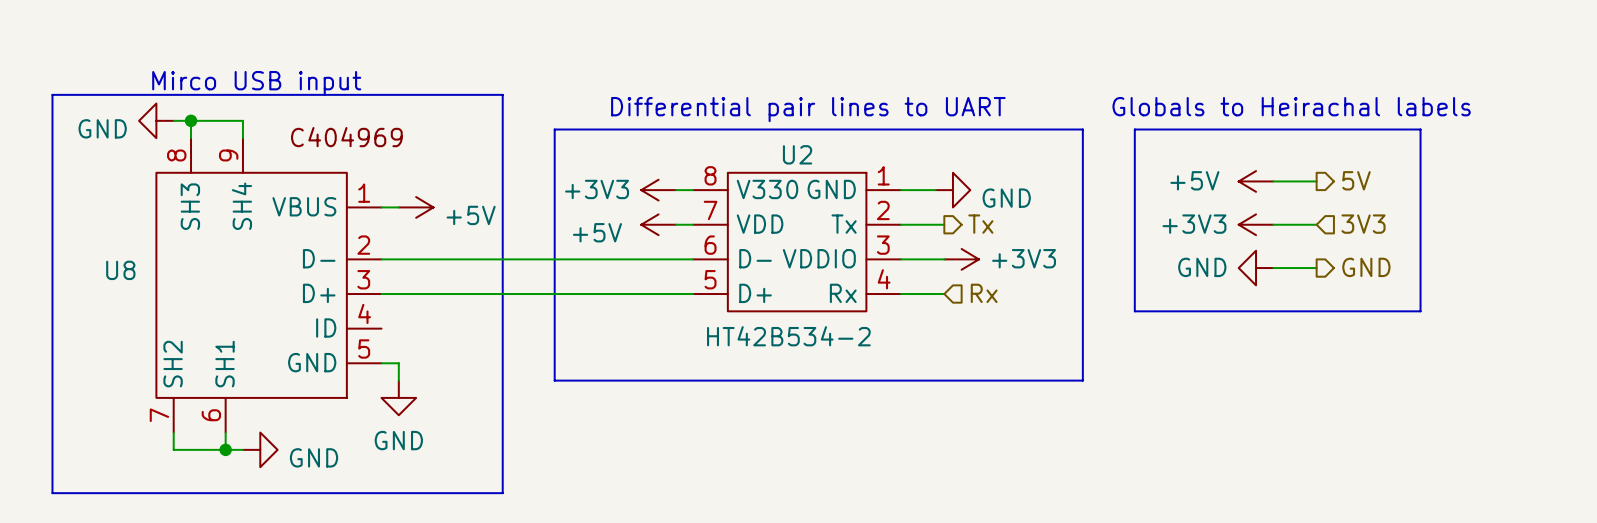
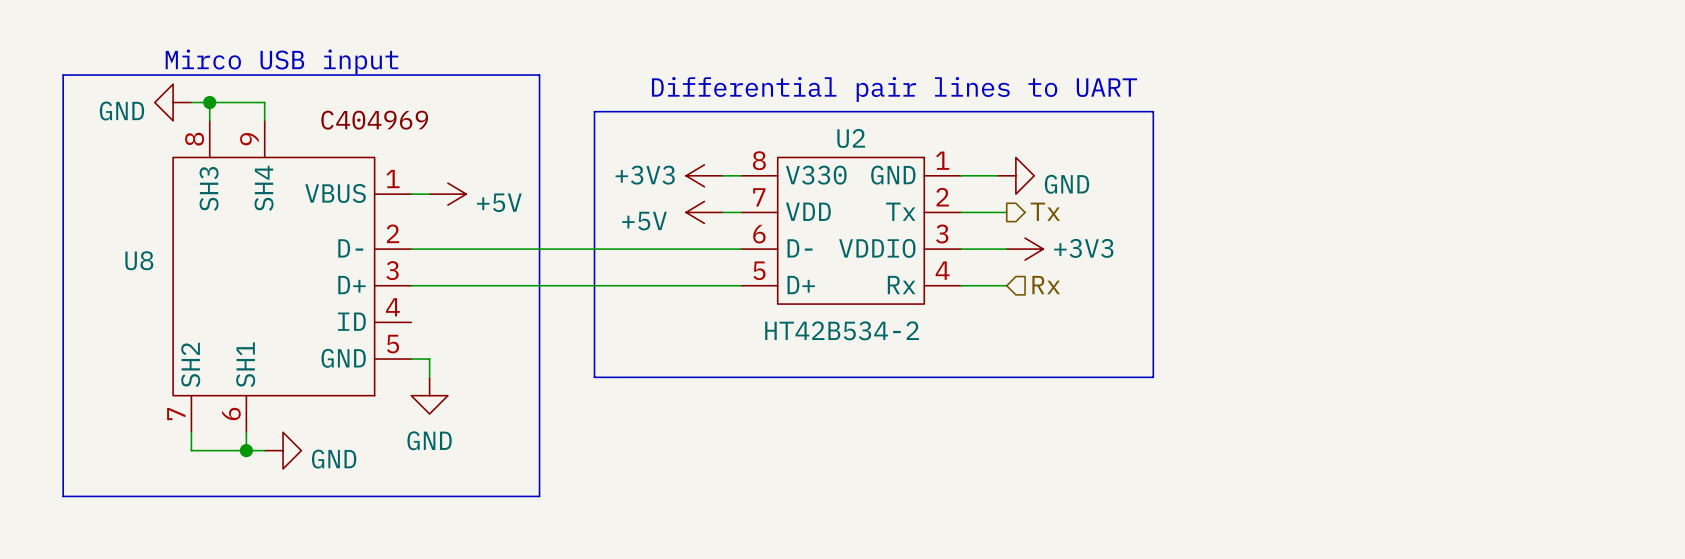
text: Globals to Heirachal labels (1291, 106) -> none
line: (1134, 129) (1420, 129) (1420, 311) (1134, 311) (1134, 129) -> none
hierarchical label: 5V (1356, 180) -> none
power symbol: +5V (1256, 181) -> none
wire: (1273, 181) (1316, 181) -> none
power symbol: +3V3 (1256, 224) -> none
wire: (1273, 224) (1316, 224) -> none
hierarchical label: 3V3 (1363, 224) -> none
hierarchical label: GND (1366, 267) -> none
power symbol: GND (1256, 268) -> none
wire: (1273, 268) (1316, 268) -> none

